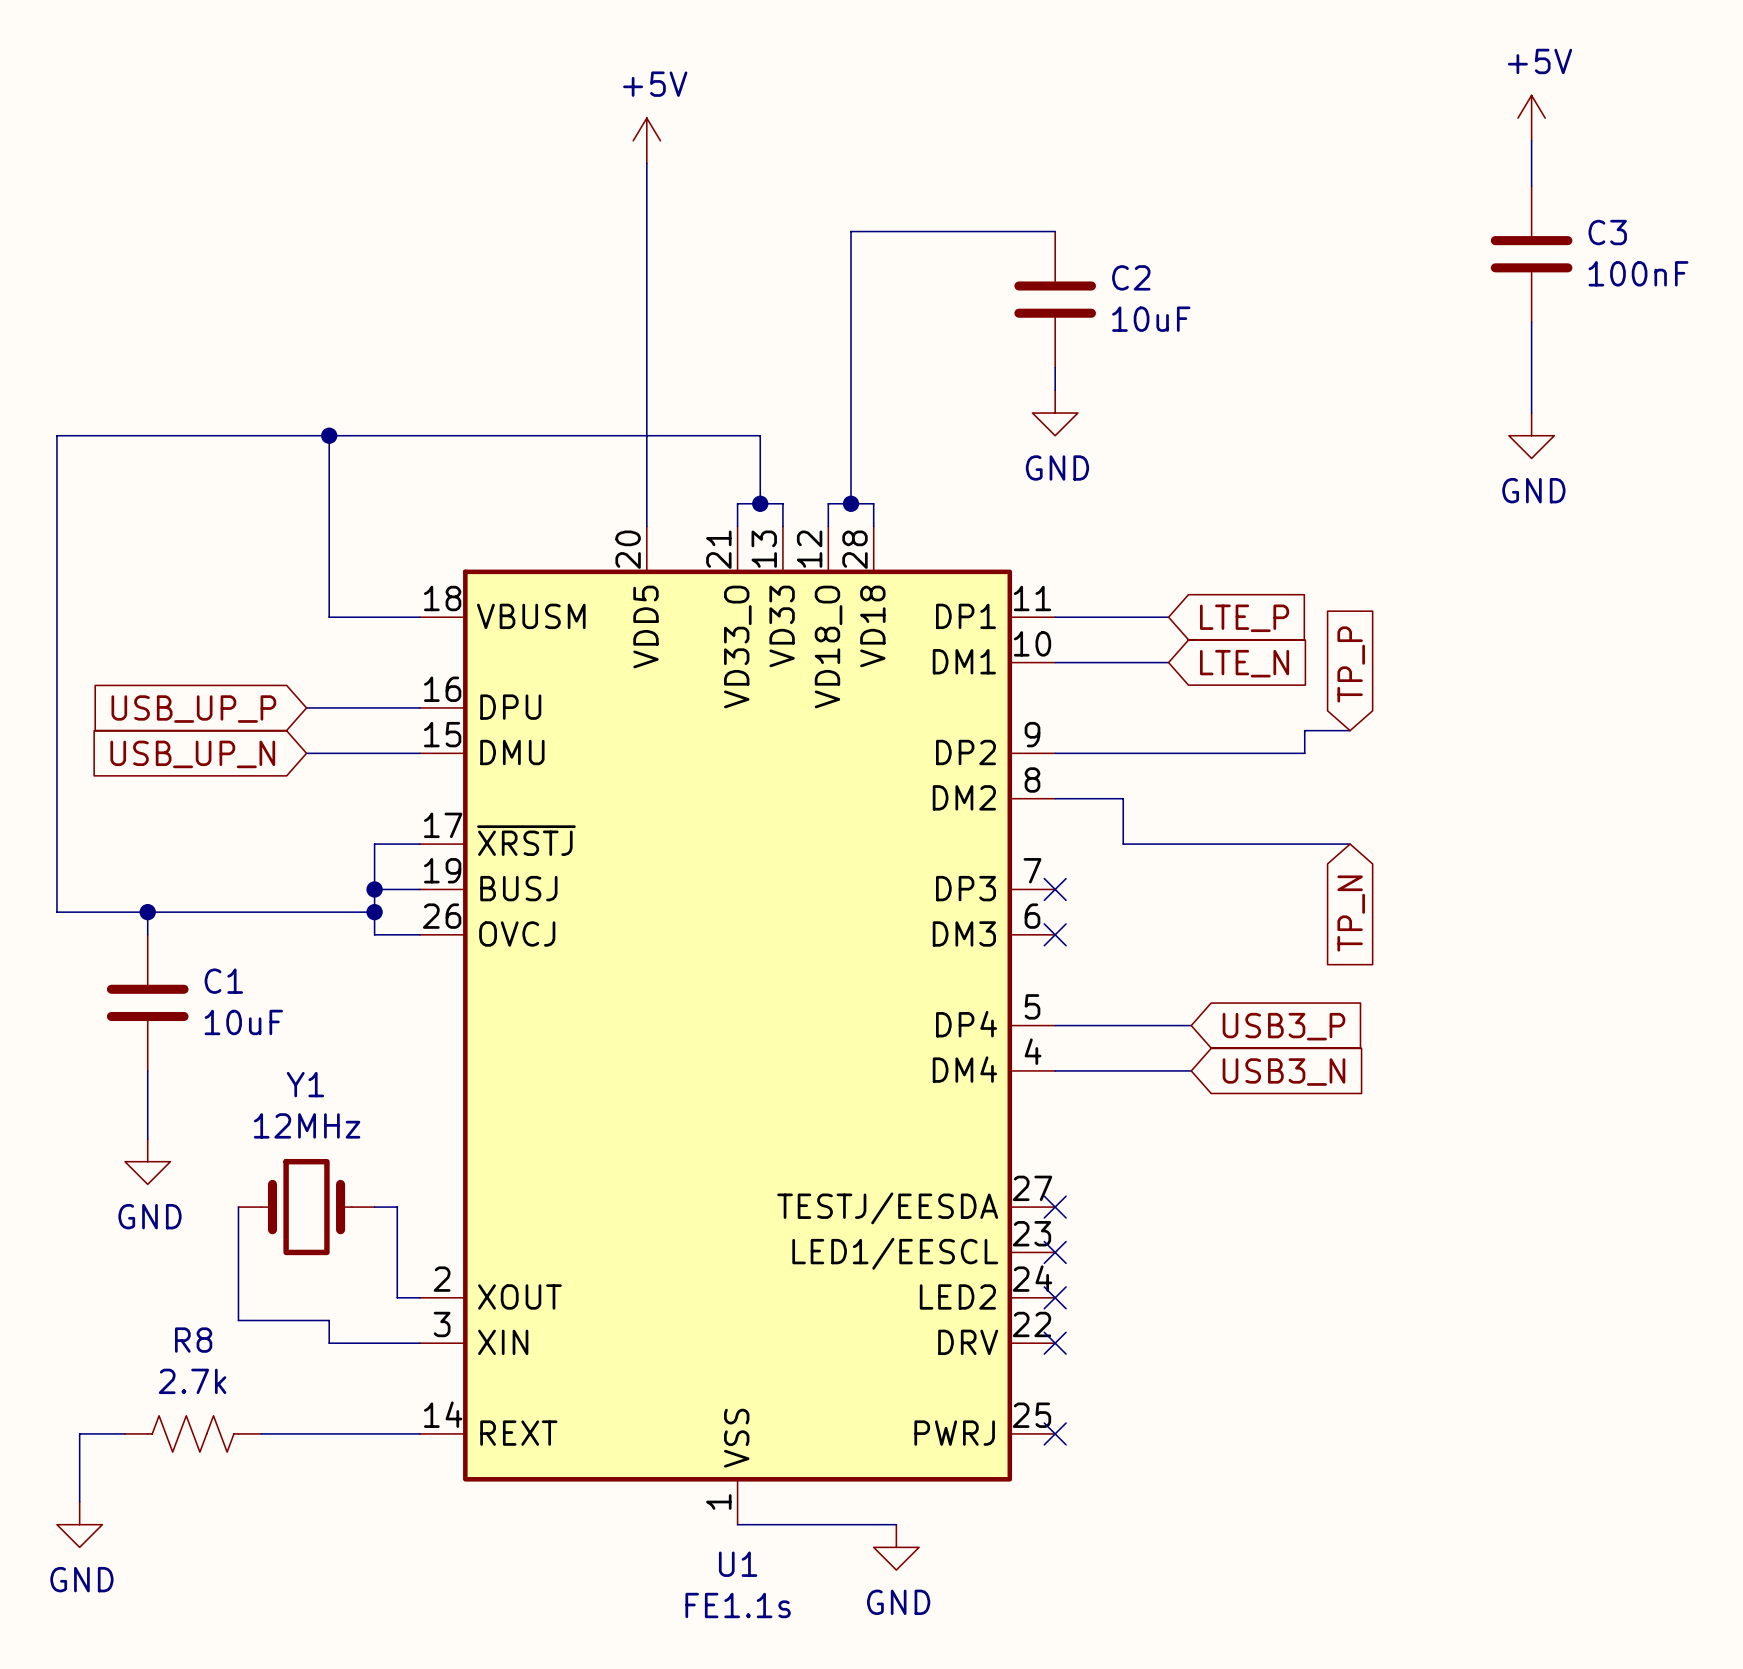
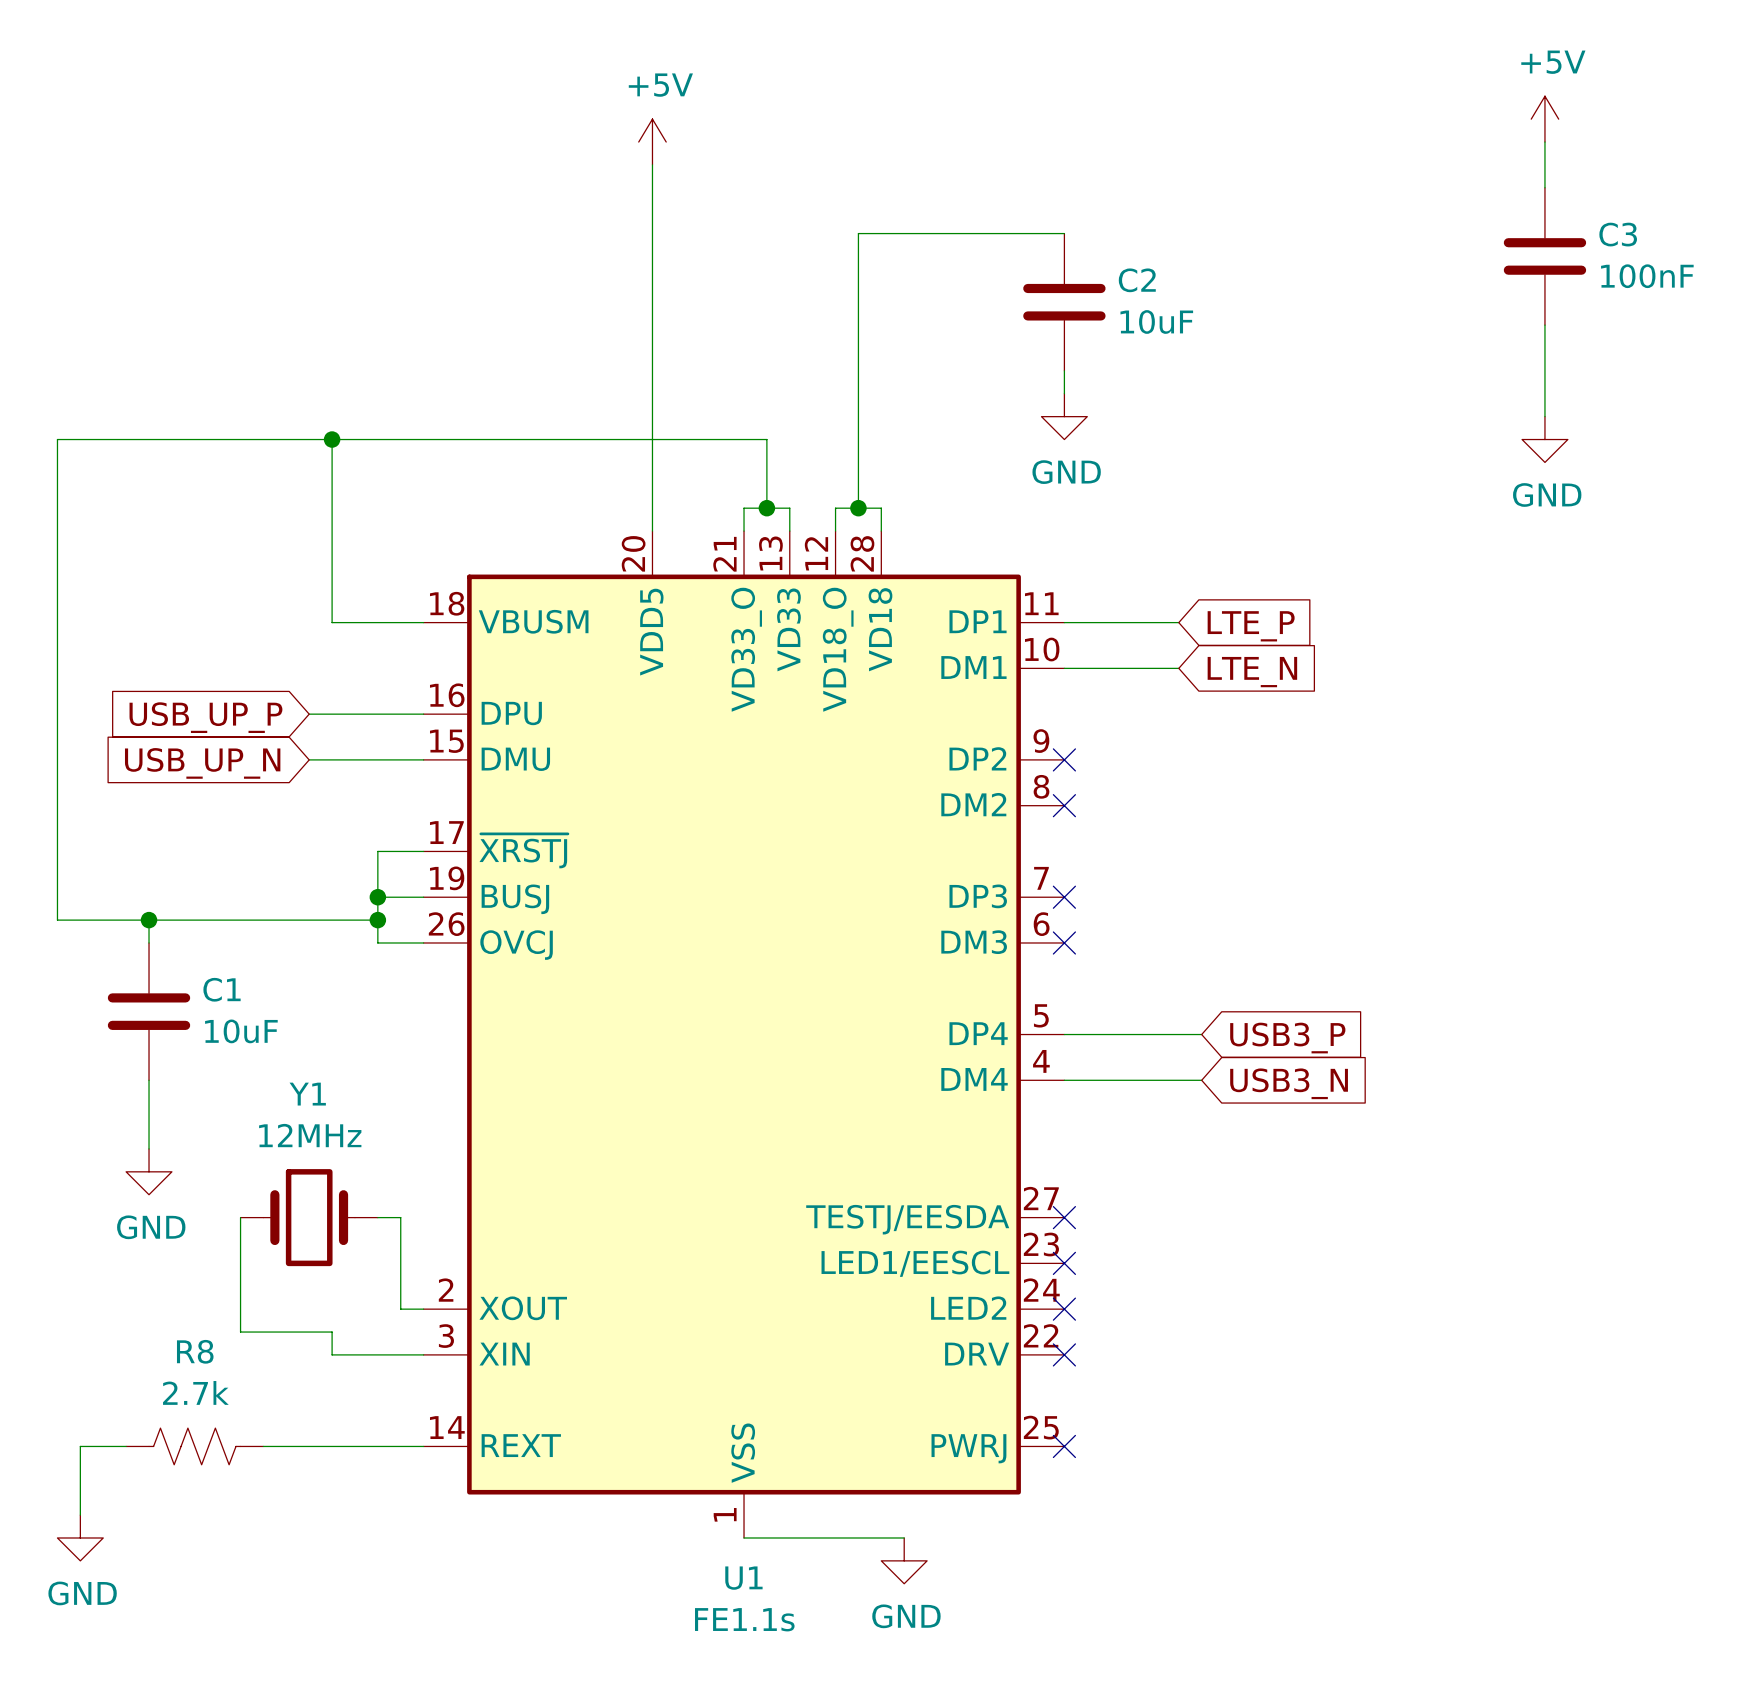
global label: TP_P (1351, 664) -> none
wire: (1350, 730) (1304, 730) (1304, 753) (1055, 753) -> none
no-connect mark: none -> (1064, 759)
wire: (1055, 798) (1123, 798) (1123, 844) (1350, 844) -> none
no-connect mark: none -> (1064, 805)
global label: TP_N (1351, 913) -> none

